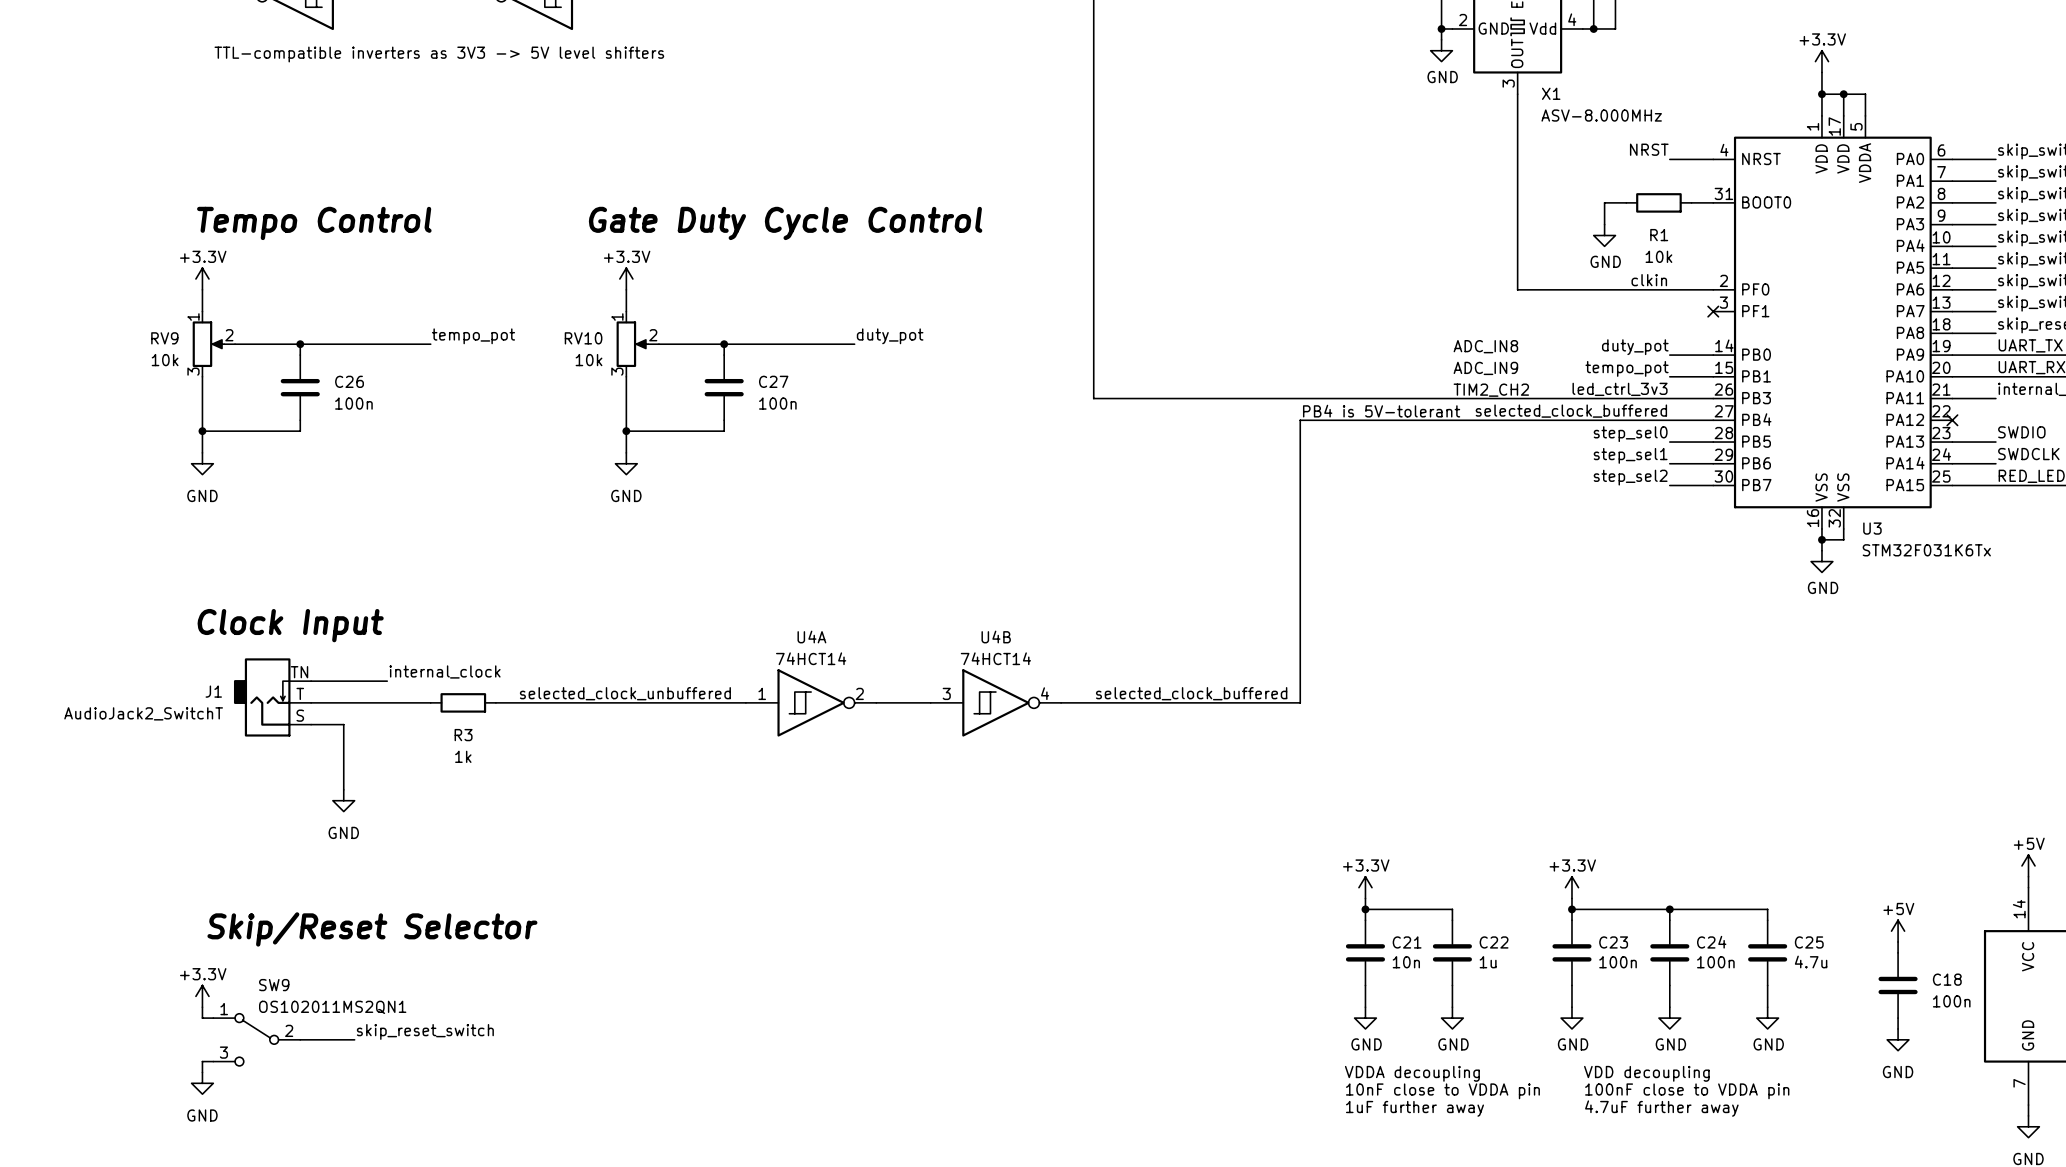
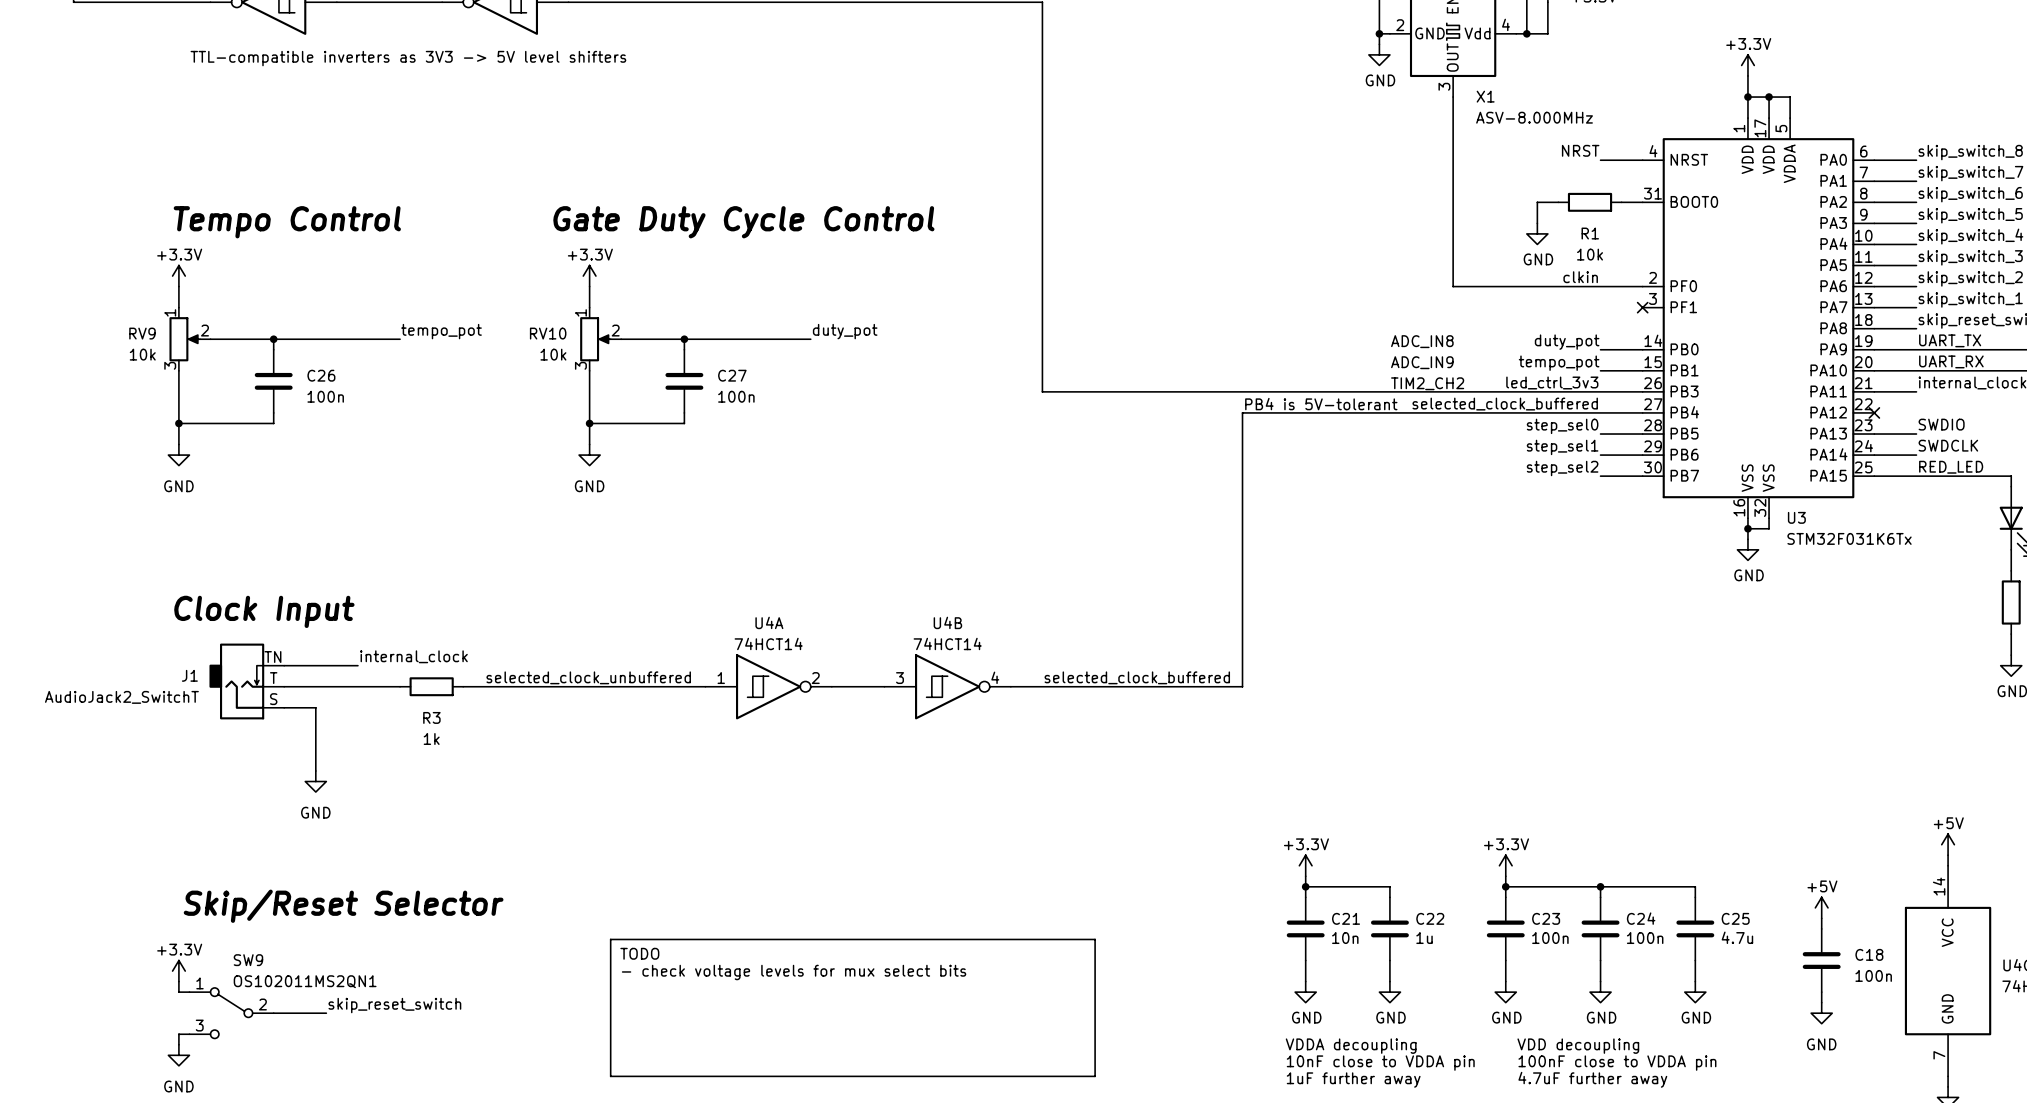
line: none -> (610, 939) (1095, 939) (1095, 1076) (610, 1076) (610, 939)
text: none -> TODO (639, 953)
text: none -> - check voltage levels for mux select bits (794, 972)

